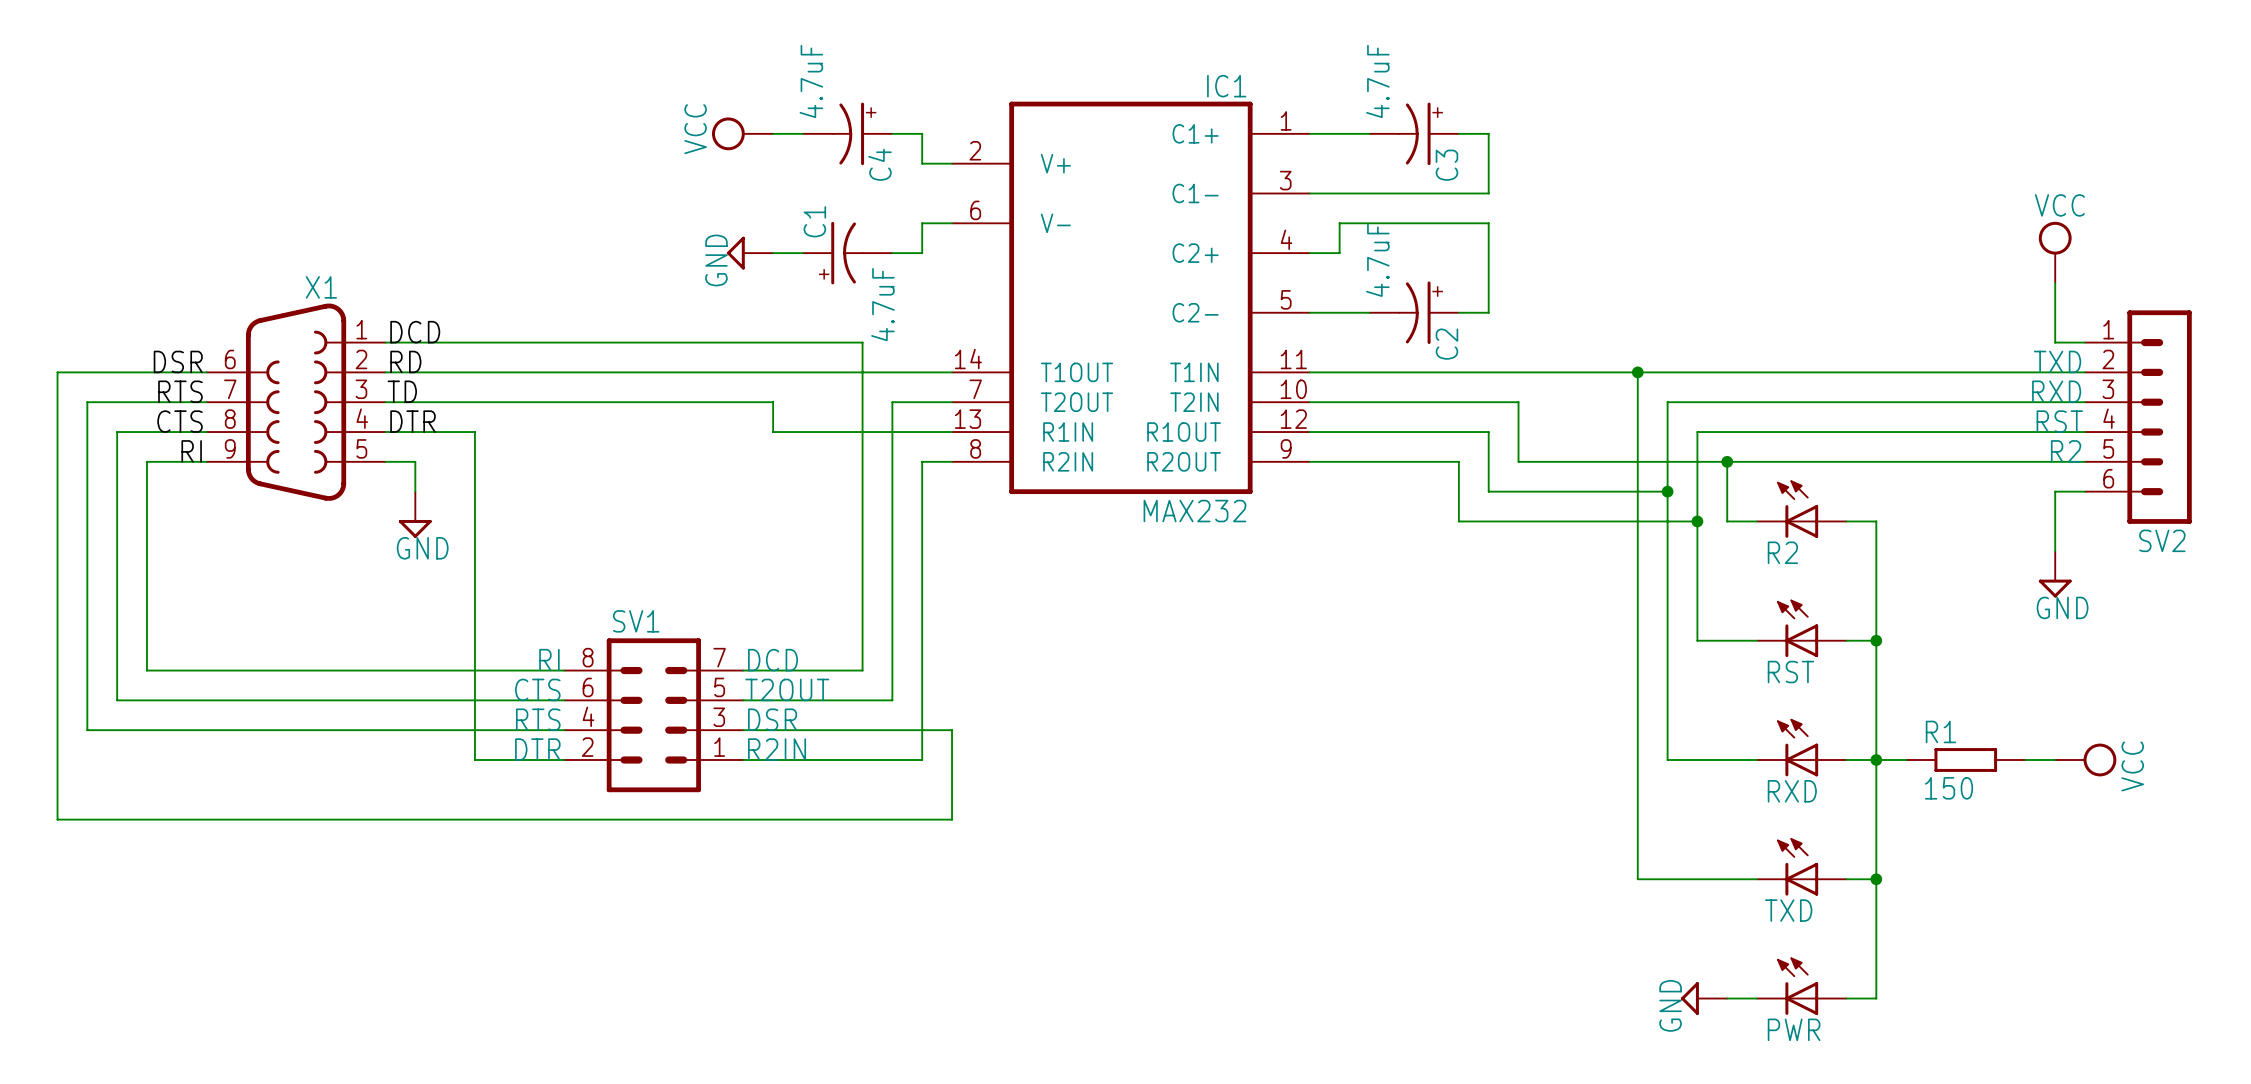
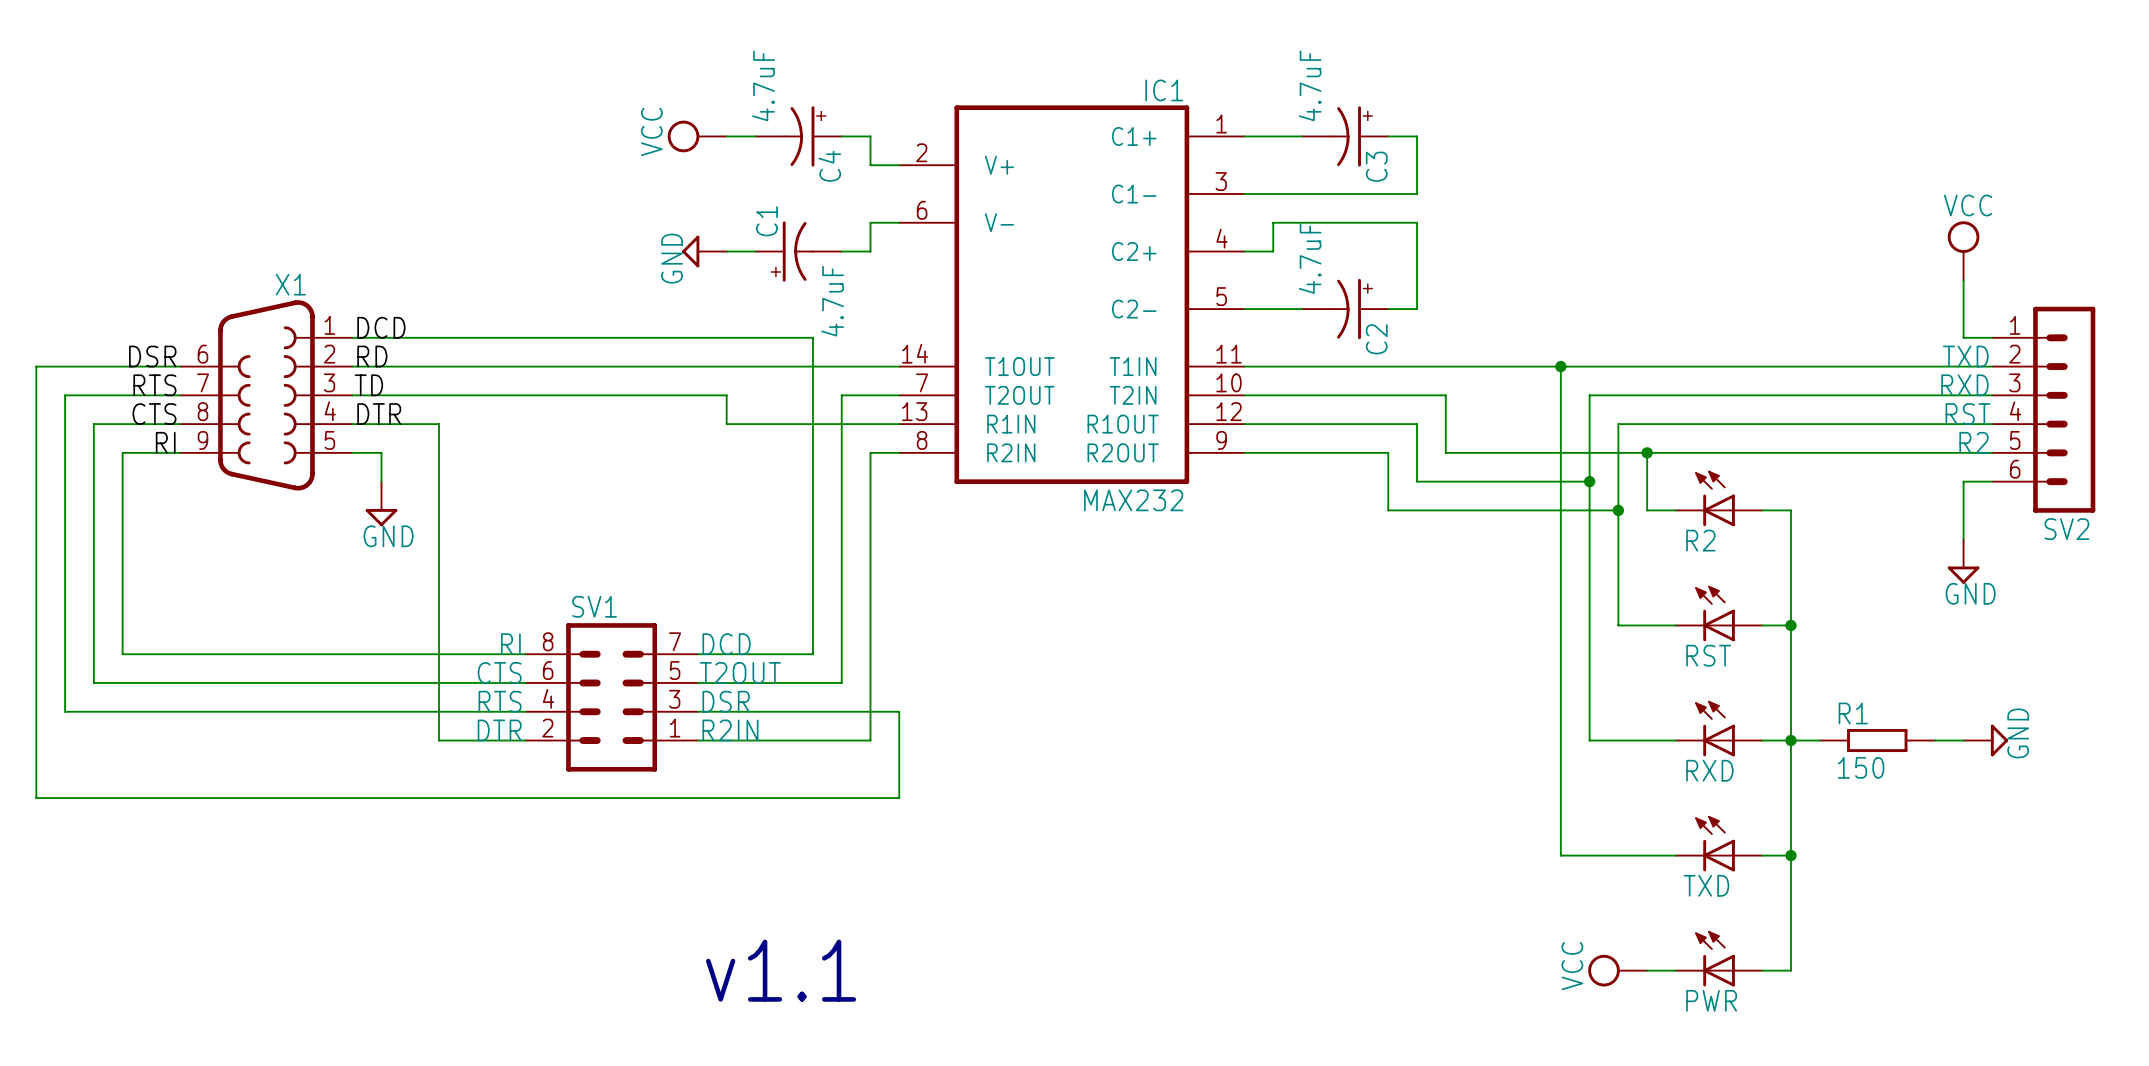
power symbol: VCC (2085, 759) -> GND (1985, 740)
text: none -> v1.1 (781, 970)
power symbol: GND (1704, 998) -> VCC (1617, 970)

